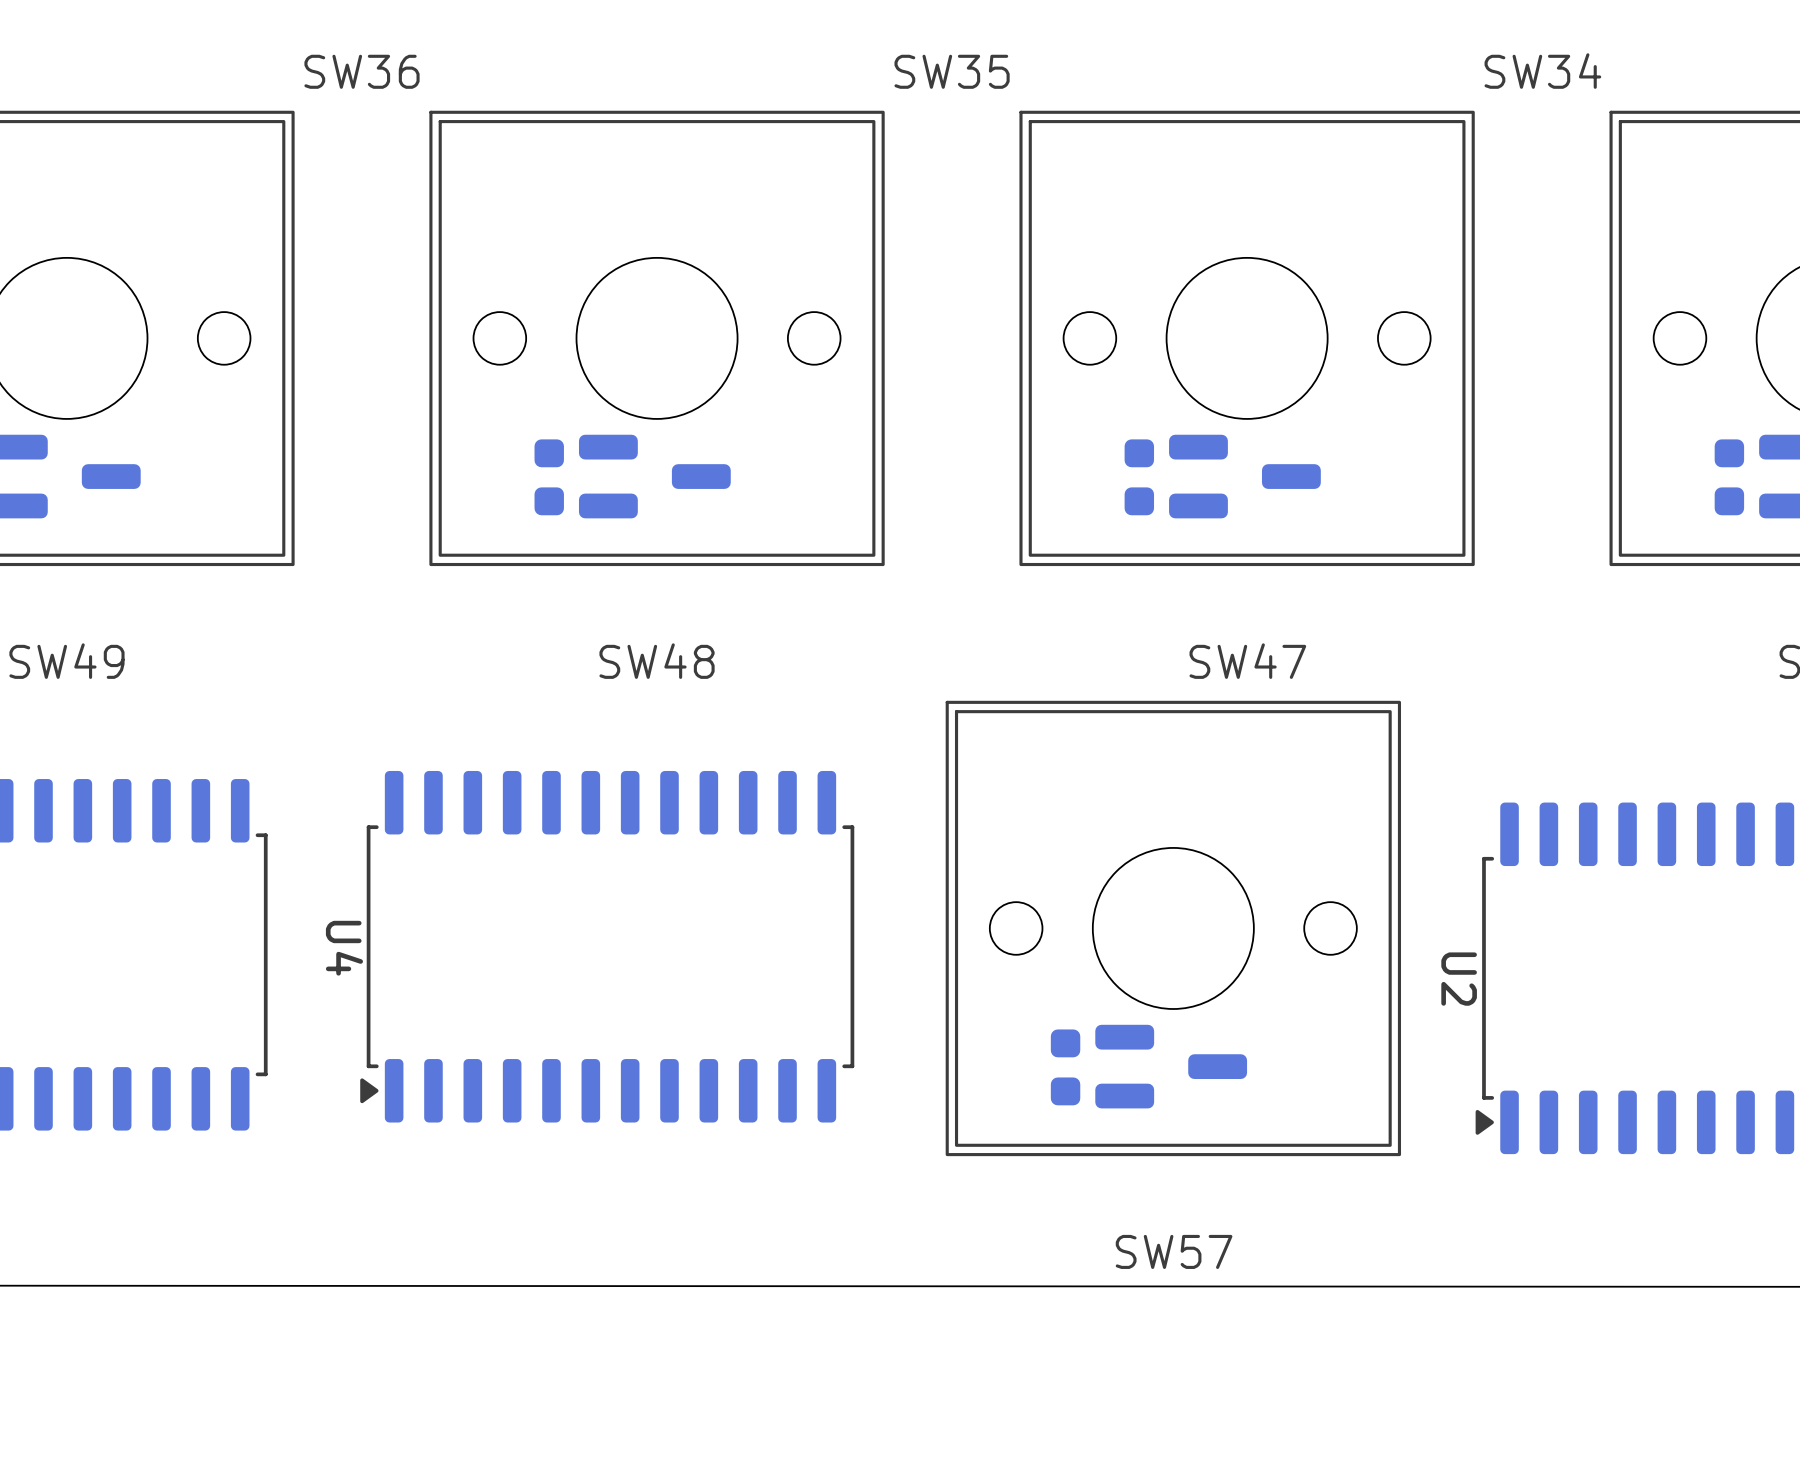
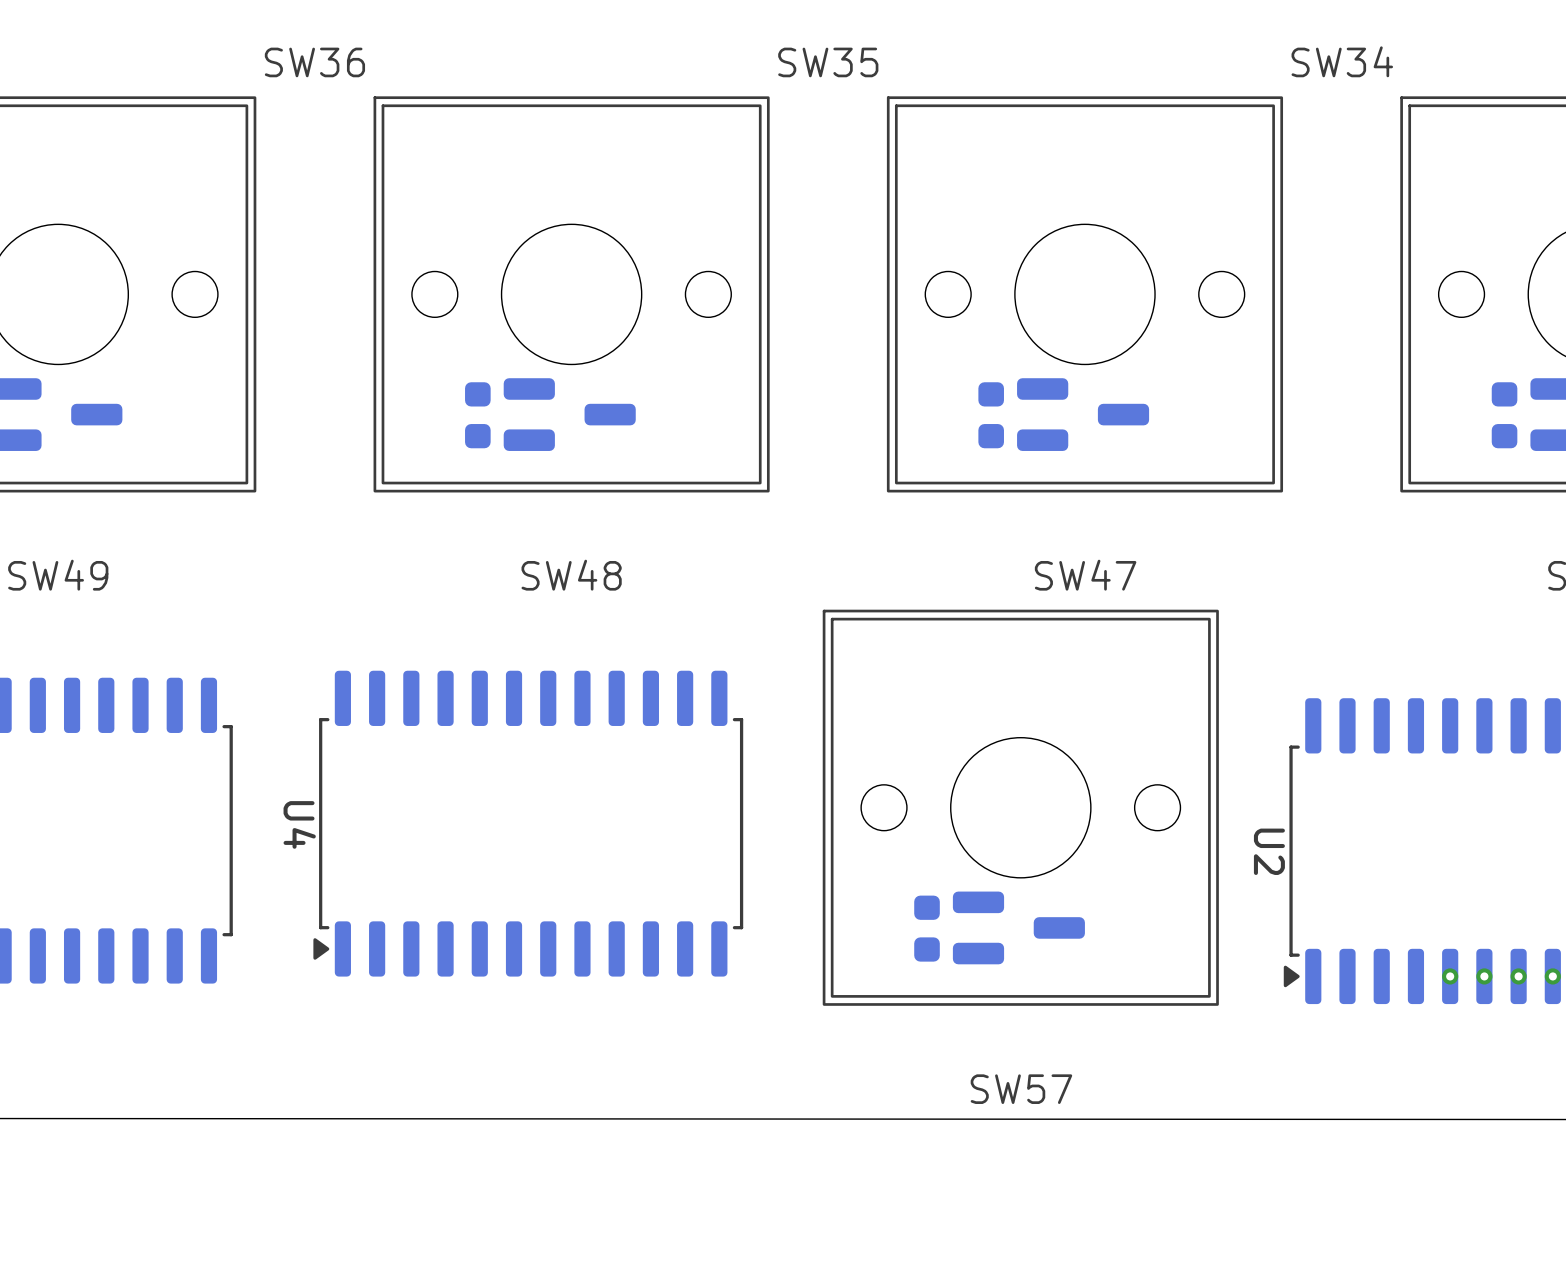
via: none -> (1450, 976)
via: none -> (1484, 976)
via: none -> (1518, 976)
via: none -> (1552, 976)

